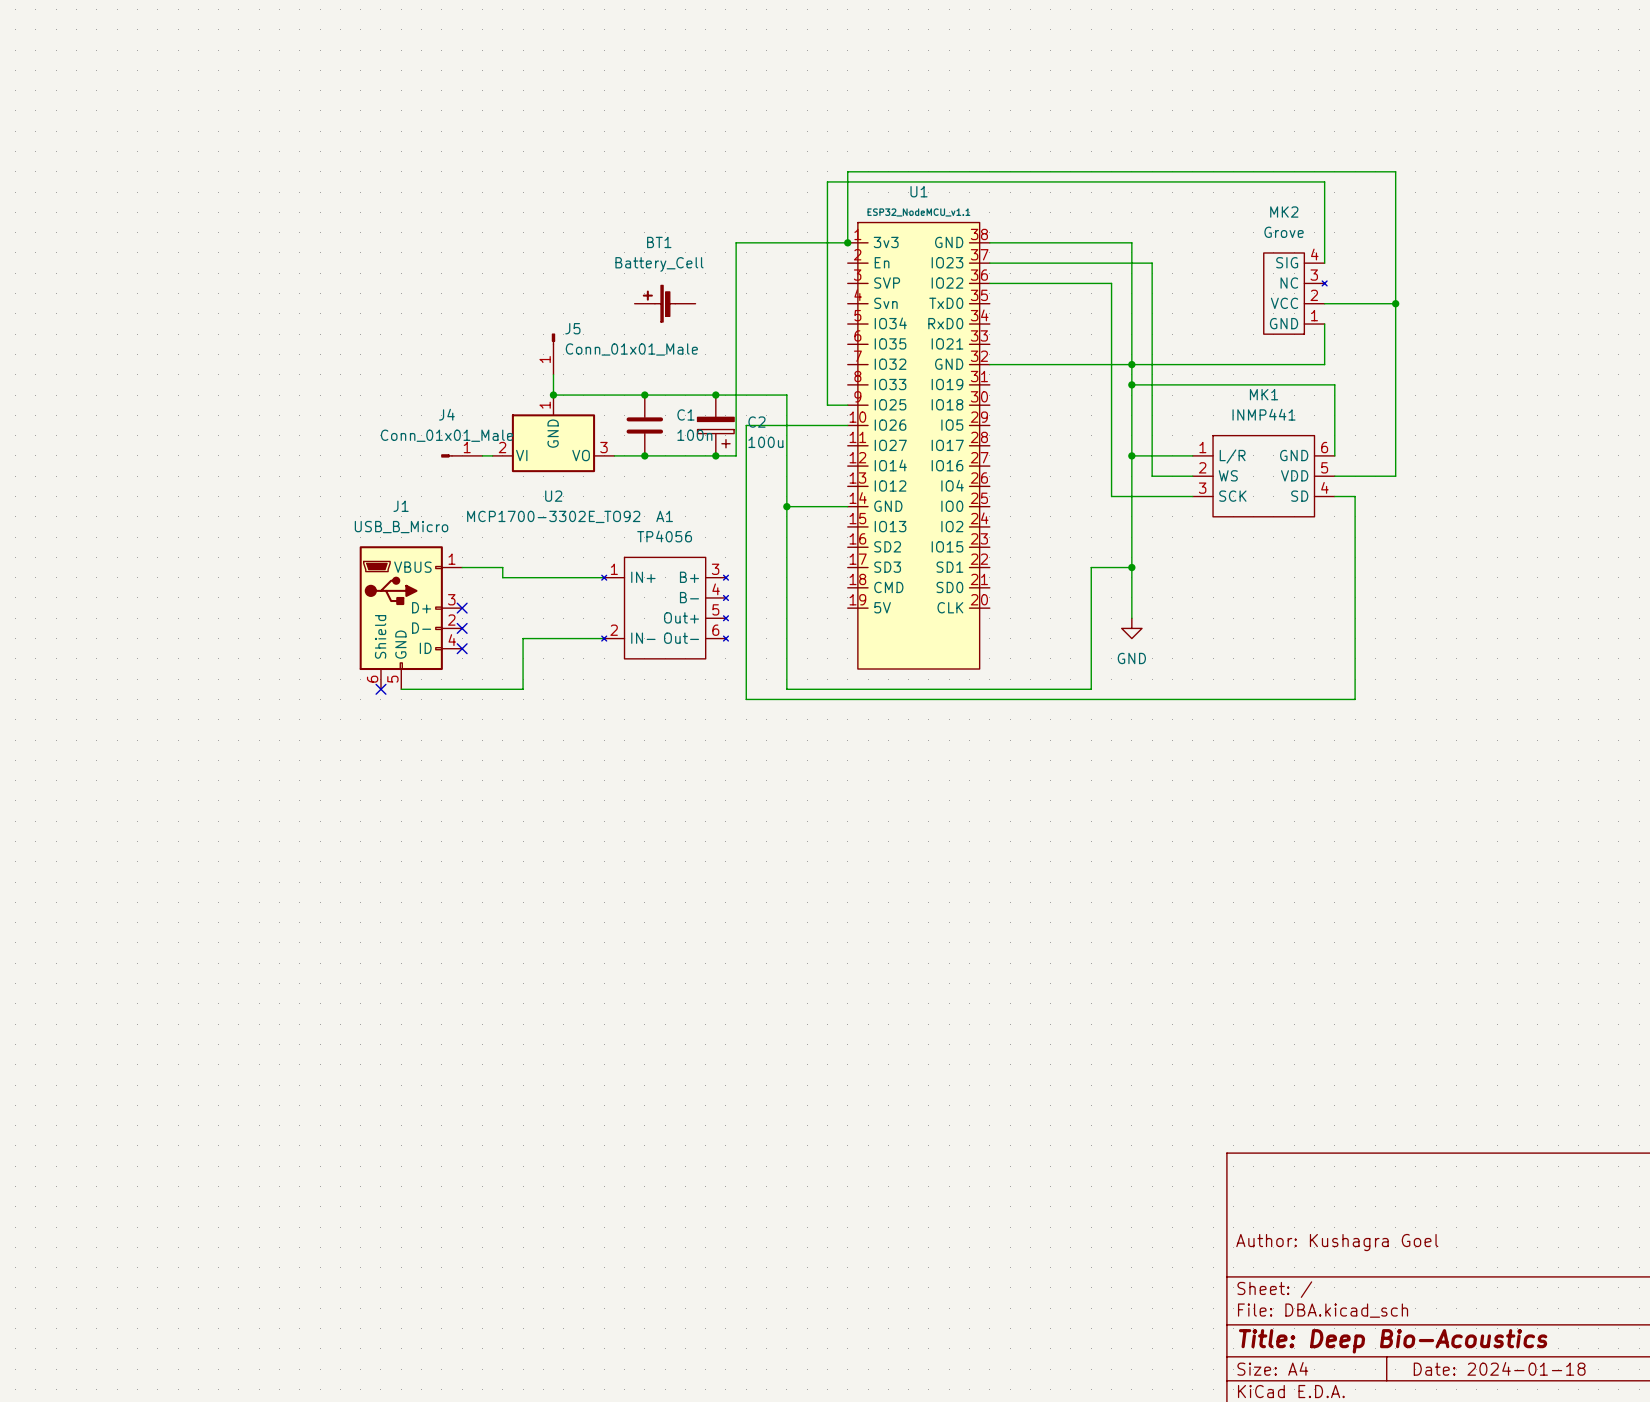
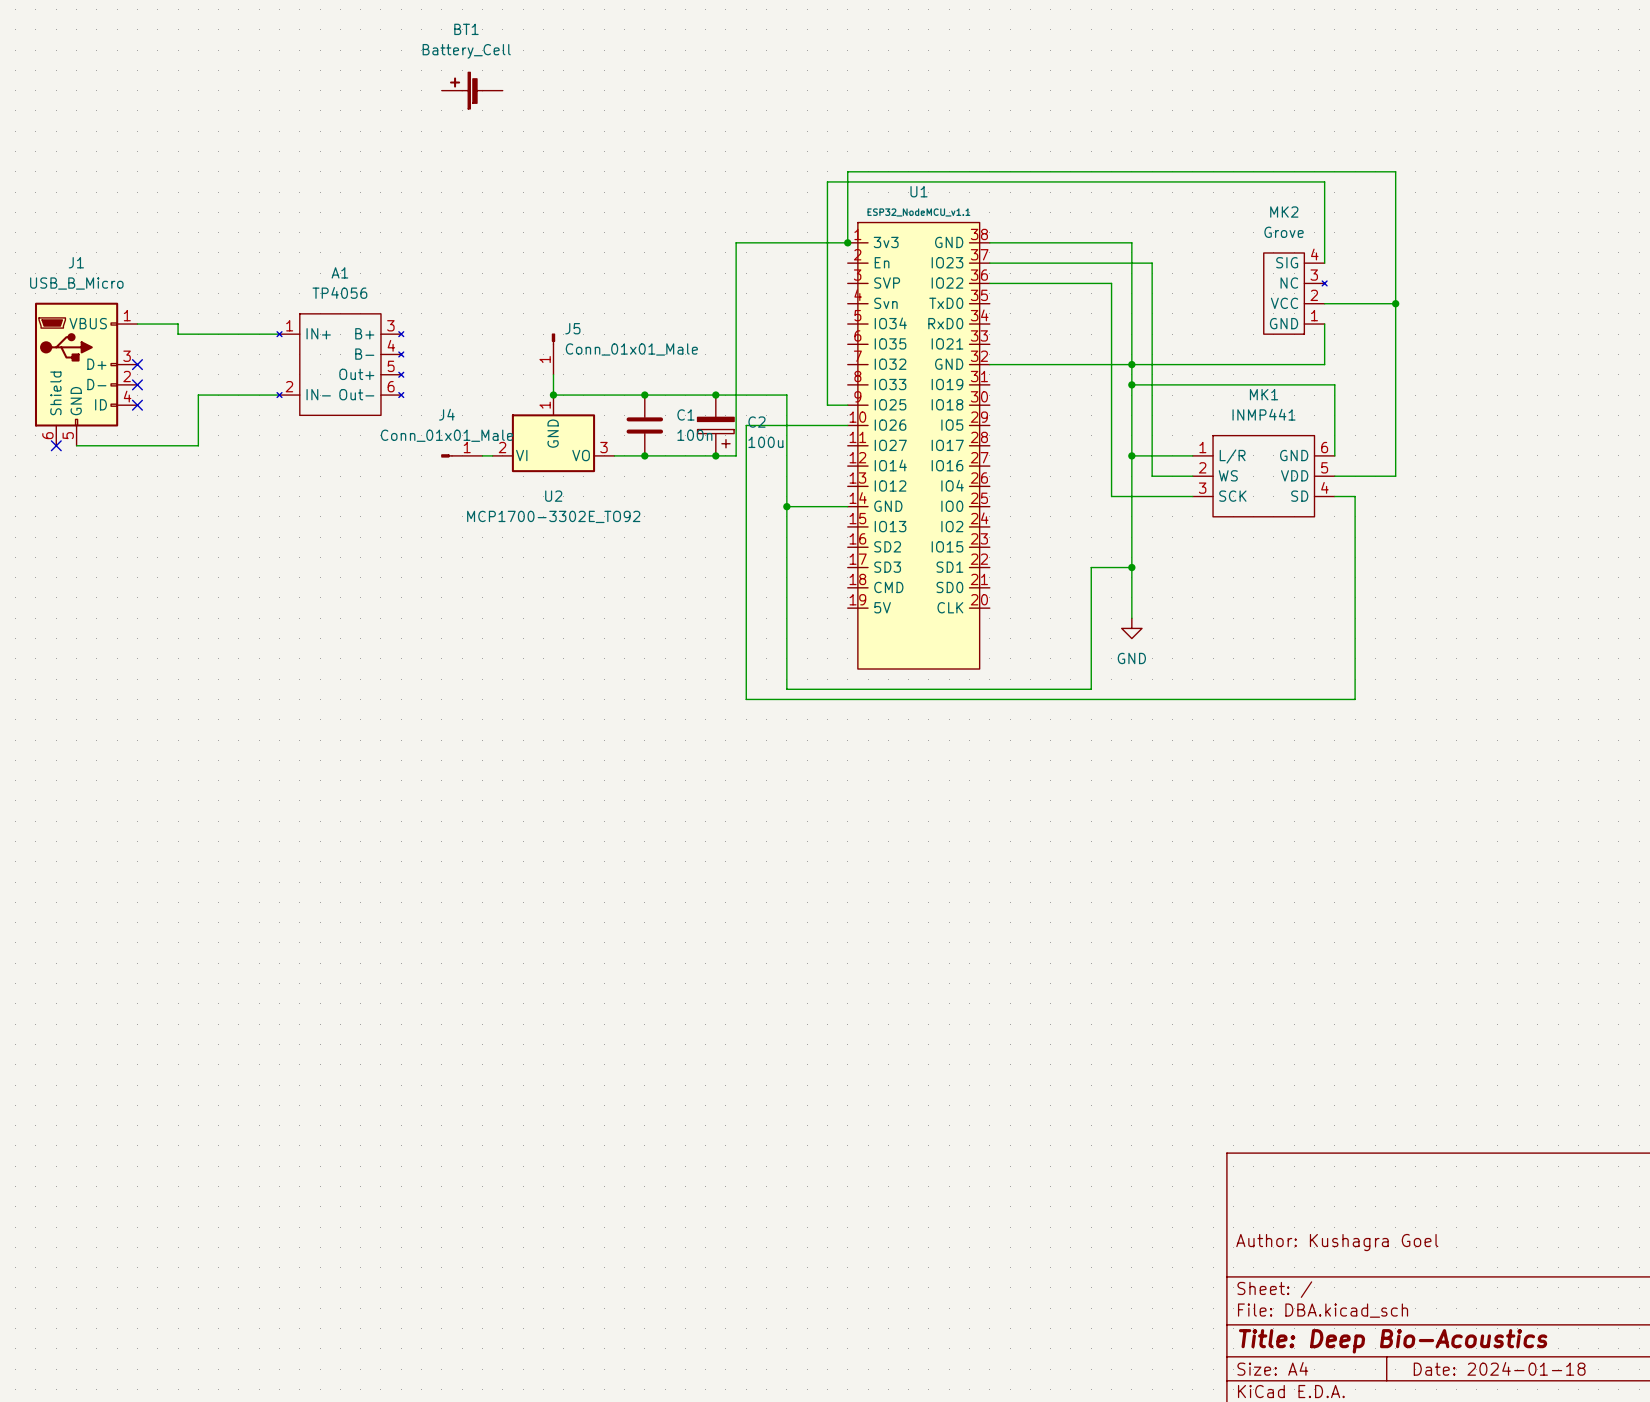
BT1 position: (665, 303) -> (472, 90)
wire: none -> (137, 324) (178, 324) (178, 334) (279, 334)
no-connect mark: none -> (137, 364)
no-connect mark: none -> (137, 384)
wire: none -> (279, 395) (198, 395) (198, 445) (76, 445)
no-connect mark: none -> (137, 405)
no-connect mark: none -> (56, 445)
wire: (462, 567) (502, 567) (502, 577) (604, 577) -> none
no-connect mark: (462, 608) -> none
A1 position: (665, 608) -> (340, 364)
J1 position: (410, 617) -> (86, 374)
no-connect mark: (462, 628) -> none
wire: (604, 638) (523, 638) (523, 689) (401, 689) -> none
no-connect mark: (462, 648) -> none
no-connect mark: (380, 689) -> none

